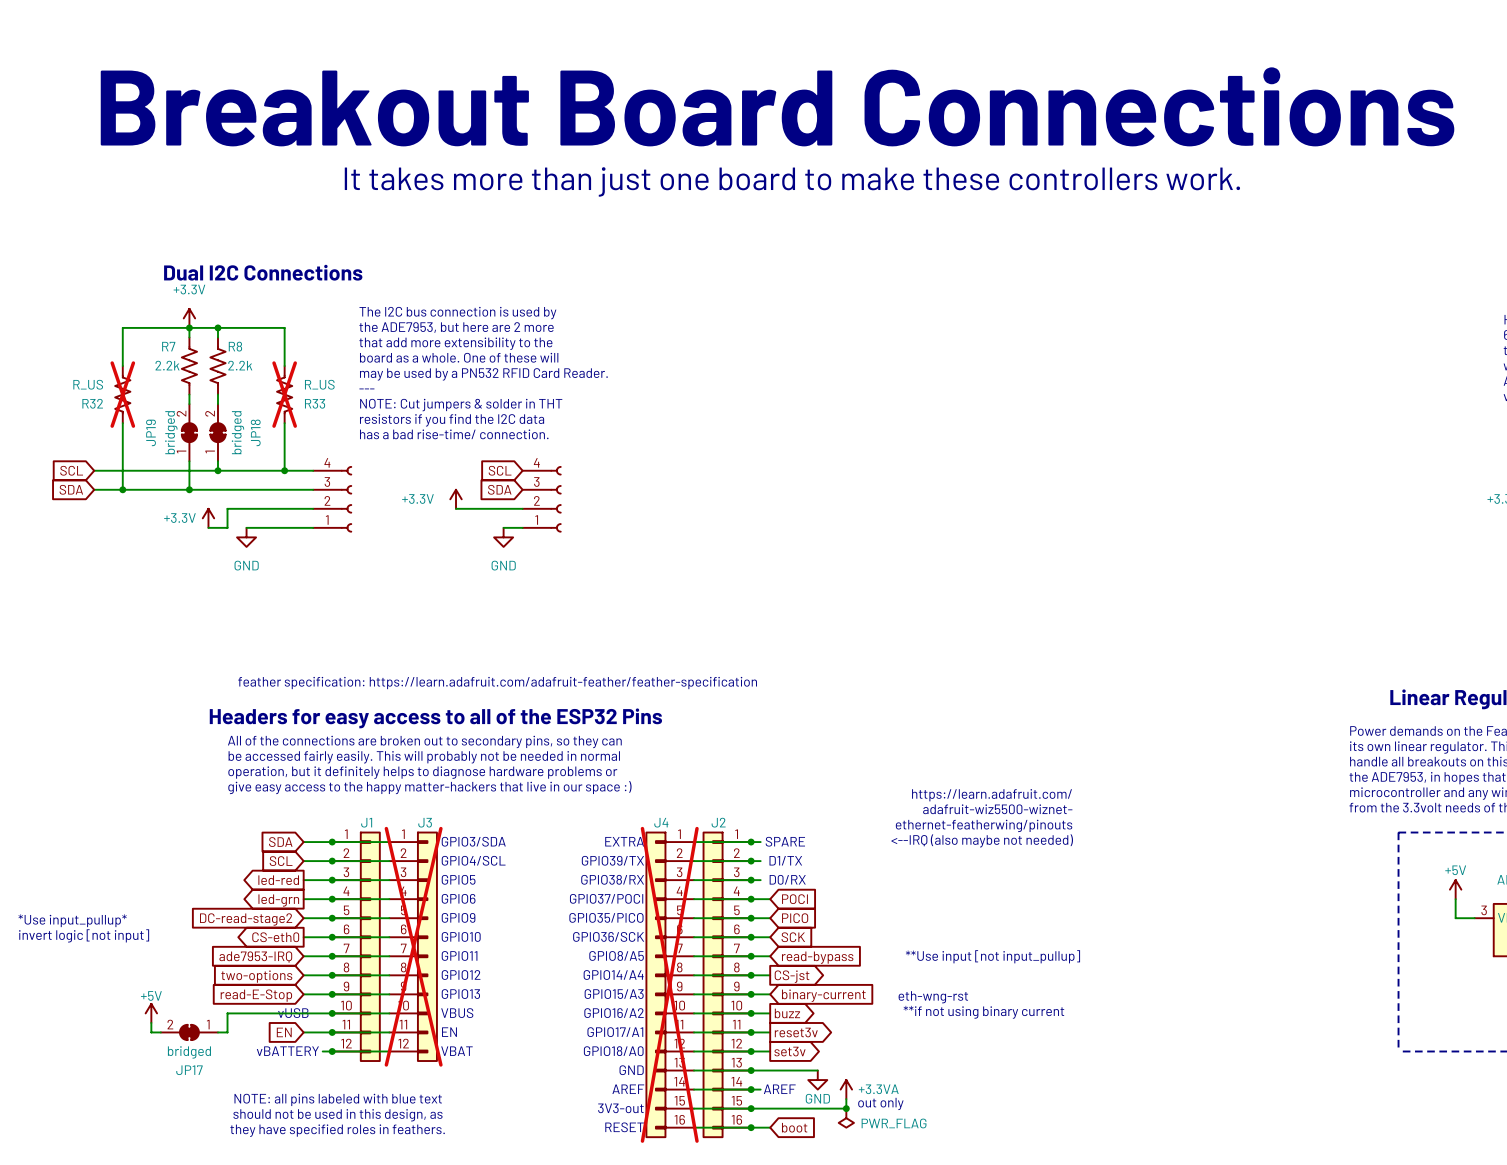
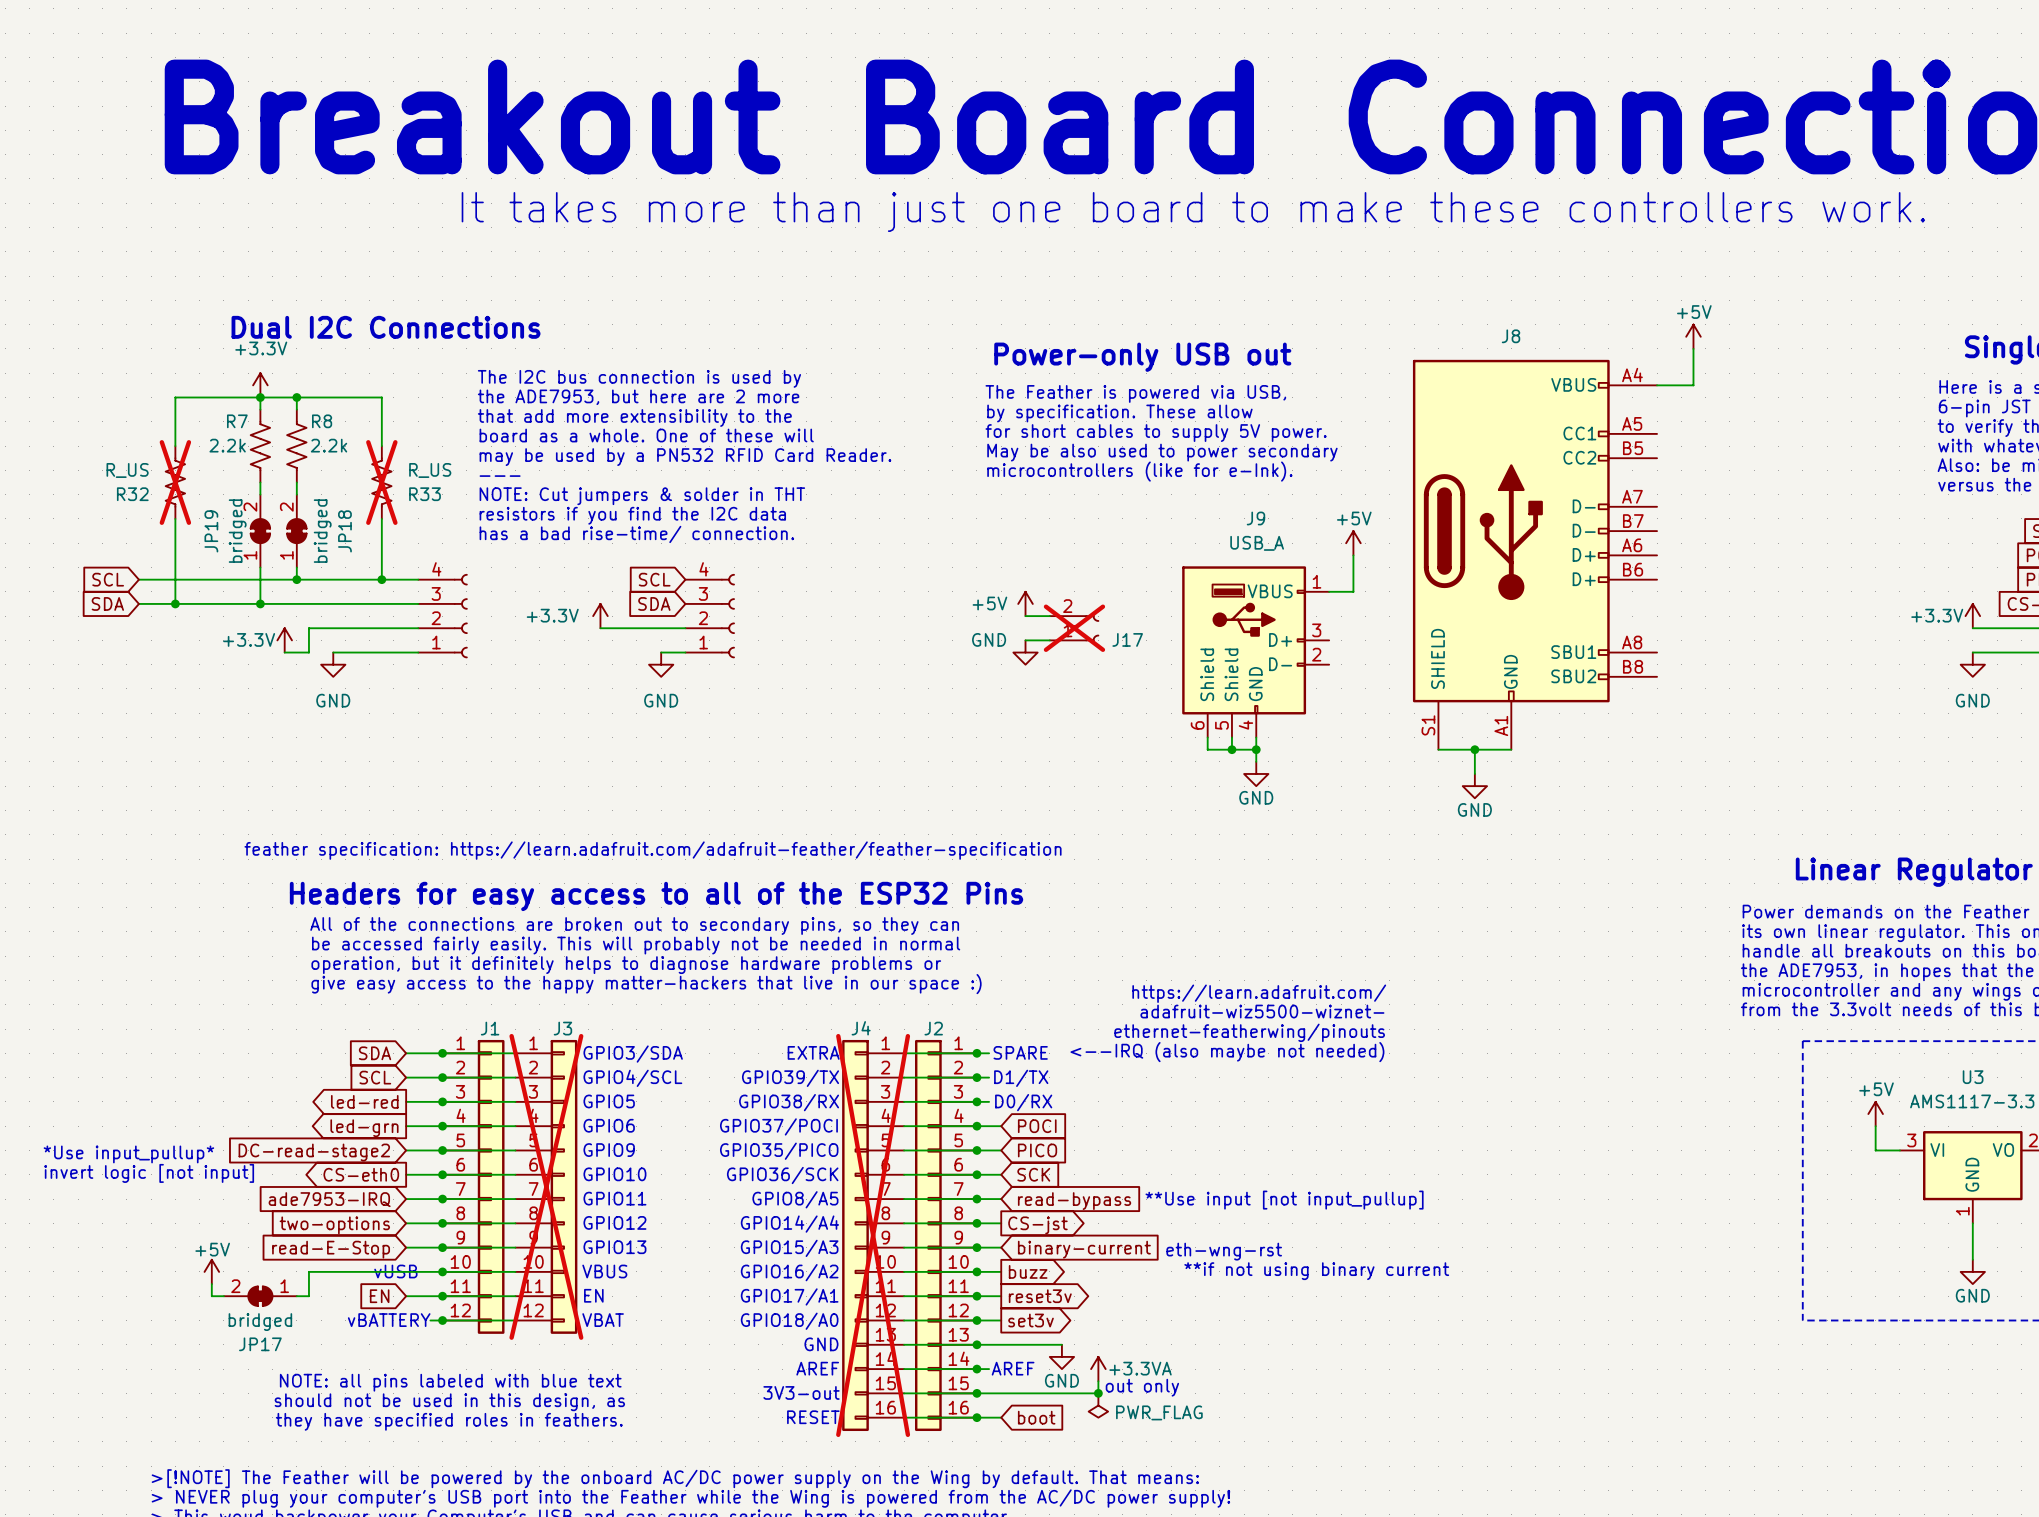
power symbol: none -> +5V (1693, 336)
wire: none -> (1693, 348) (1693, 385) (1657, 385)
text: none -> Power-only USB out (1142, 357)
text: none -> The Feather is powered via USB, (1135, 393)
text: none -> by specification. These allow (1119, 413)
text: none -> for short cables to supply 5V power. (1156, 433)
text: none -> May be also used to power secondary (1162, 452)
text: none -> microcontrollers (like for e-Ink). (1139, 471)
power symbol: none -> +5V (1353, 543)
wire: none -> (1353, 555) (1353, 591) (1329, 591)
J8: none -> (1534, 554)
power symbol: none -> +5V (1025, 603)
wire: none -> (1025, 616) (1049, 616)
J17: none -> (1074, 628)
wire: none -> (1025, 640) (1049, 640)
power symbol: none -> GND (1025, 652)
J9: none -> USB_A (1255, 651)
wire: none -> (1207, 737) (1207, 749) (1256, 749)
wire: none -> (1231, 737) (1231, 749)
wire: none -> (1256, 737) (1256, 761)
junction: none -> (1231, 749)
junction: none -> (1256, 749)
wire: none -> (1438, 749) (1511, 749)
wire: none -> (1474, 749) (1474, 773)
junction: none -> (1474, 749)
power symbol: none -> GND (1256, 773)
power symbol: none -> GND (1474, 786)

